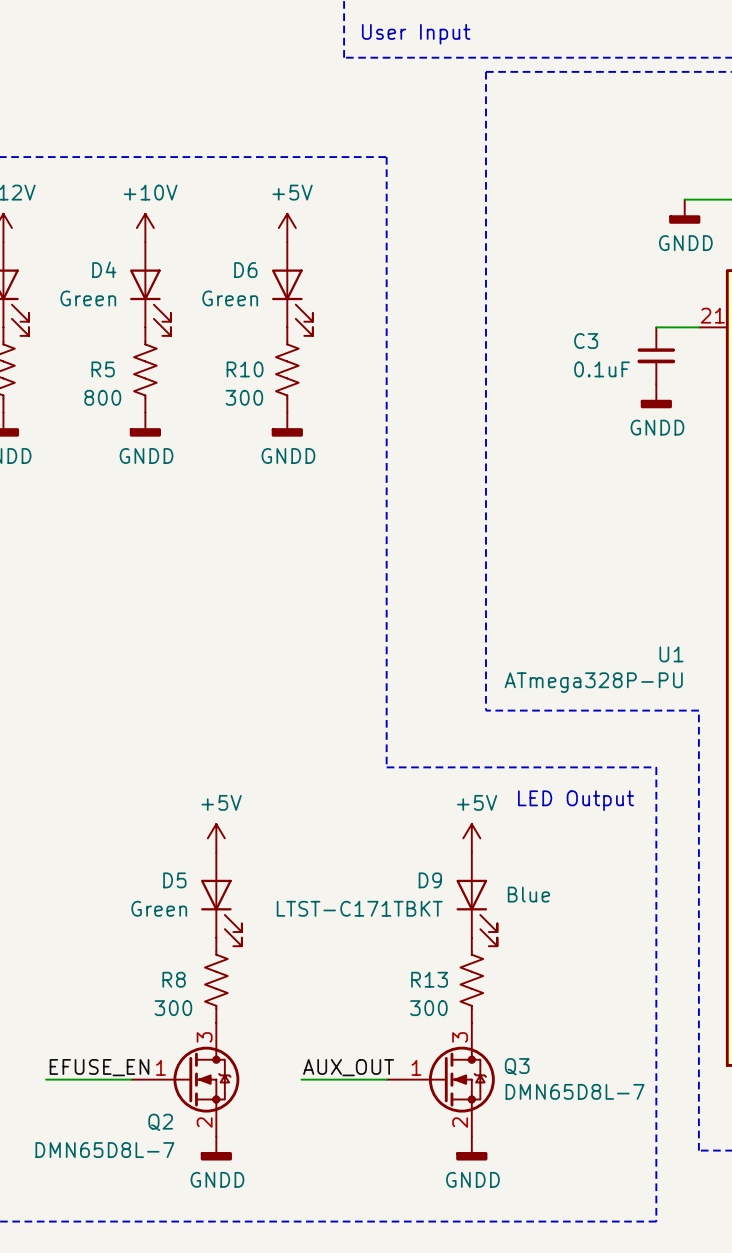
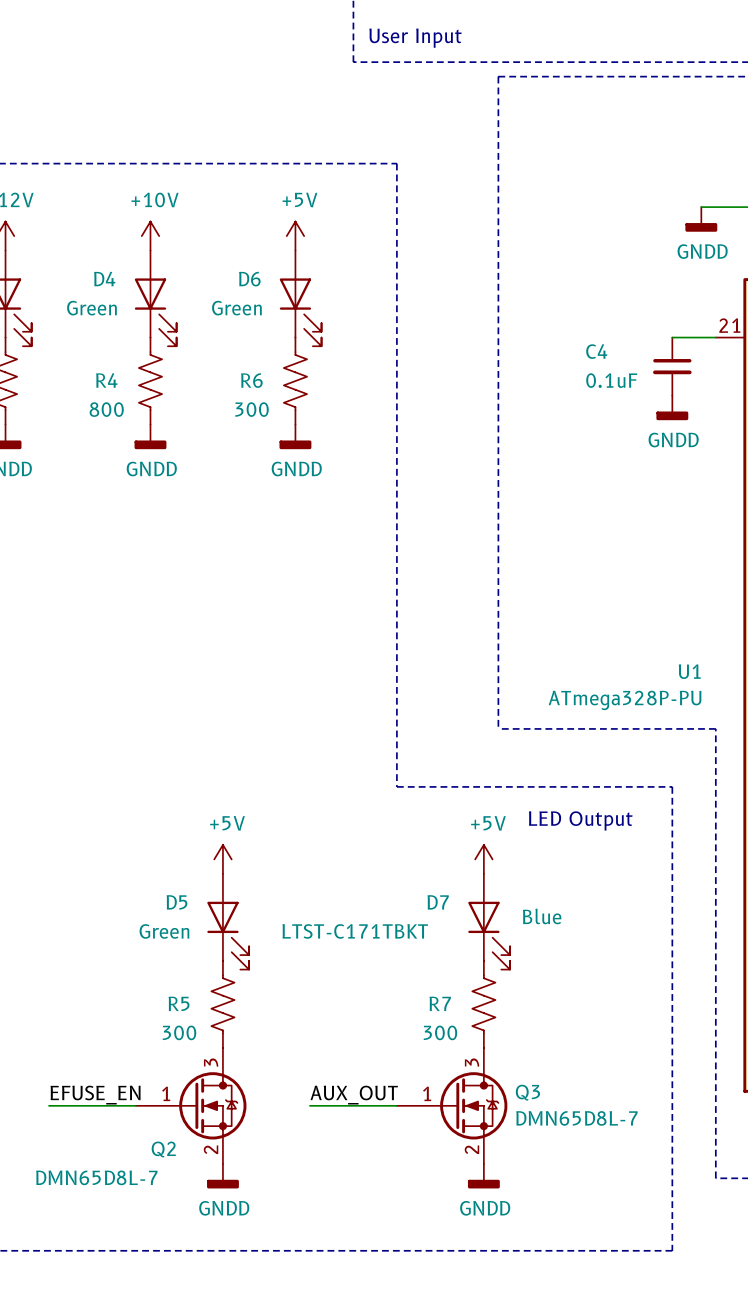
C3 name: C3 (586, 341) -> C4 (596, 351)
R5 name: R5 (103, 369) -> R4 (106, 380)
R10 name: R10 (245, 369) -> R6 (251, 380)
D9 name: D9 (430, 880) -> D7 (438, 902)
R8 name: R8 (174, 979) -> R5 (179, 1003)
R13 name: R13 (429, 979) -> R7 (440, 1003)

